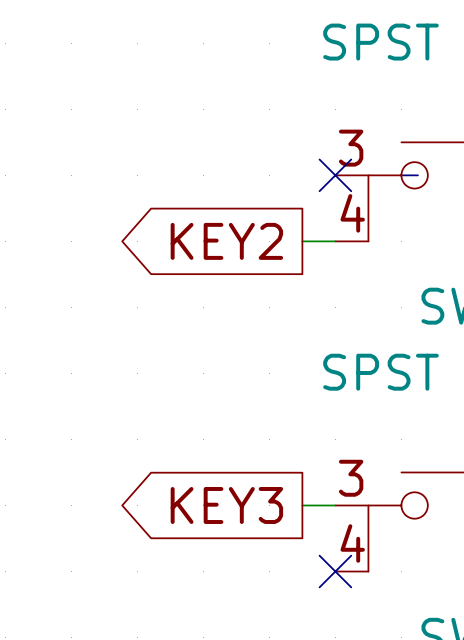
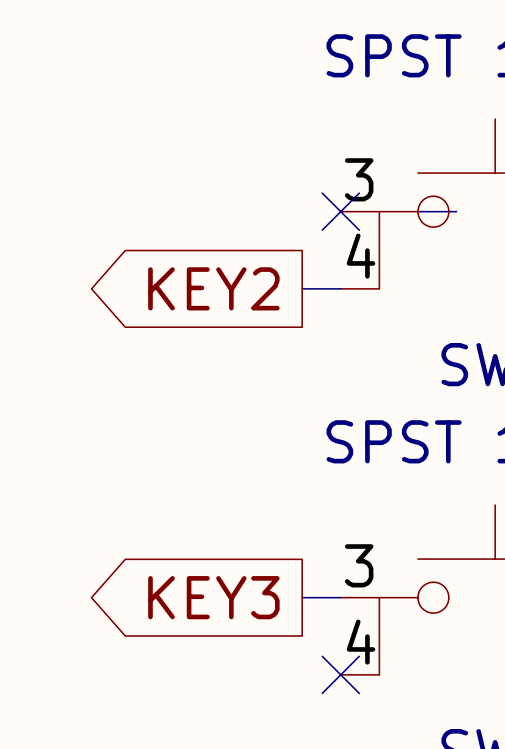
line: none -> (437, 211) (456, 211)

